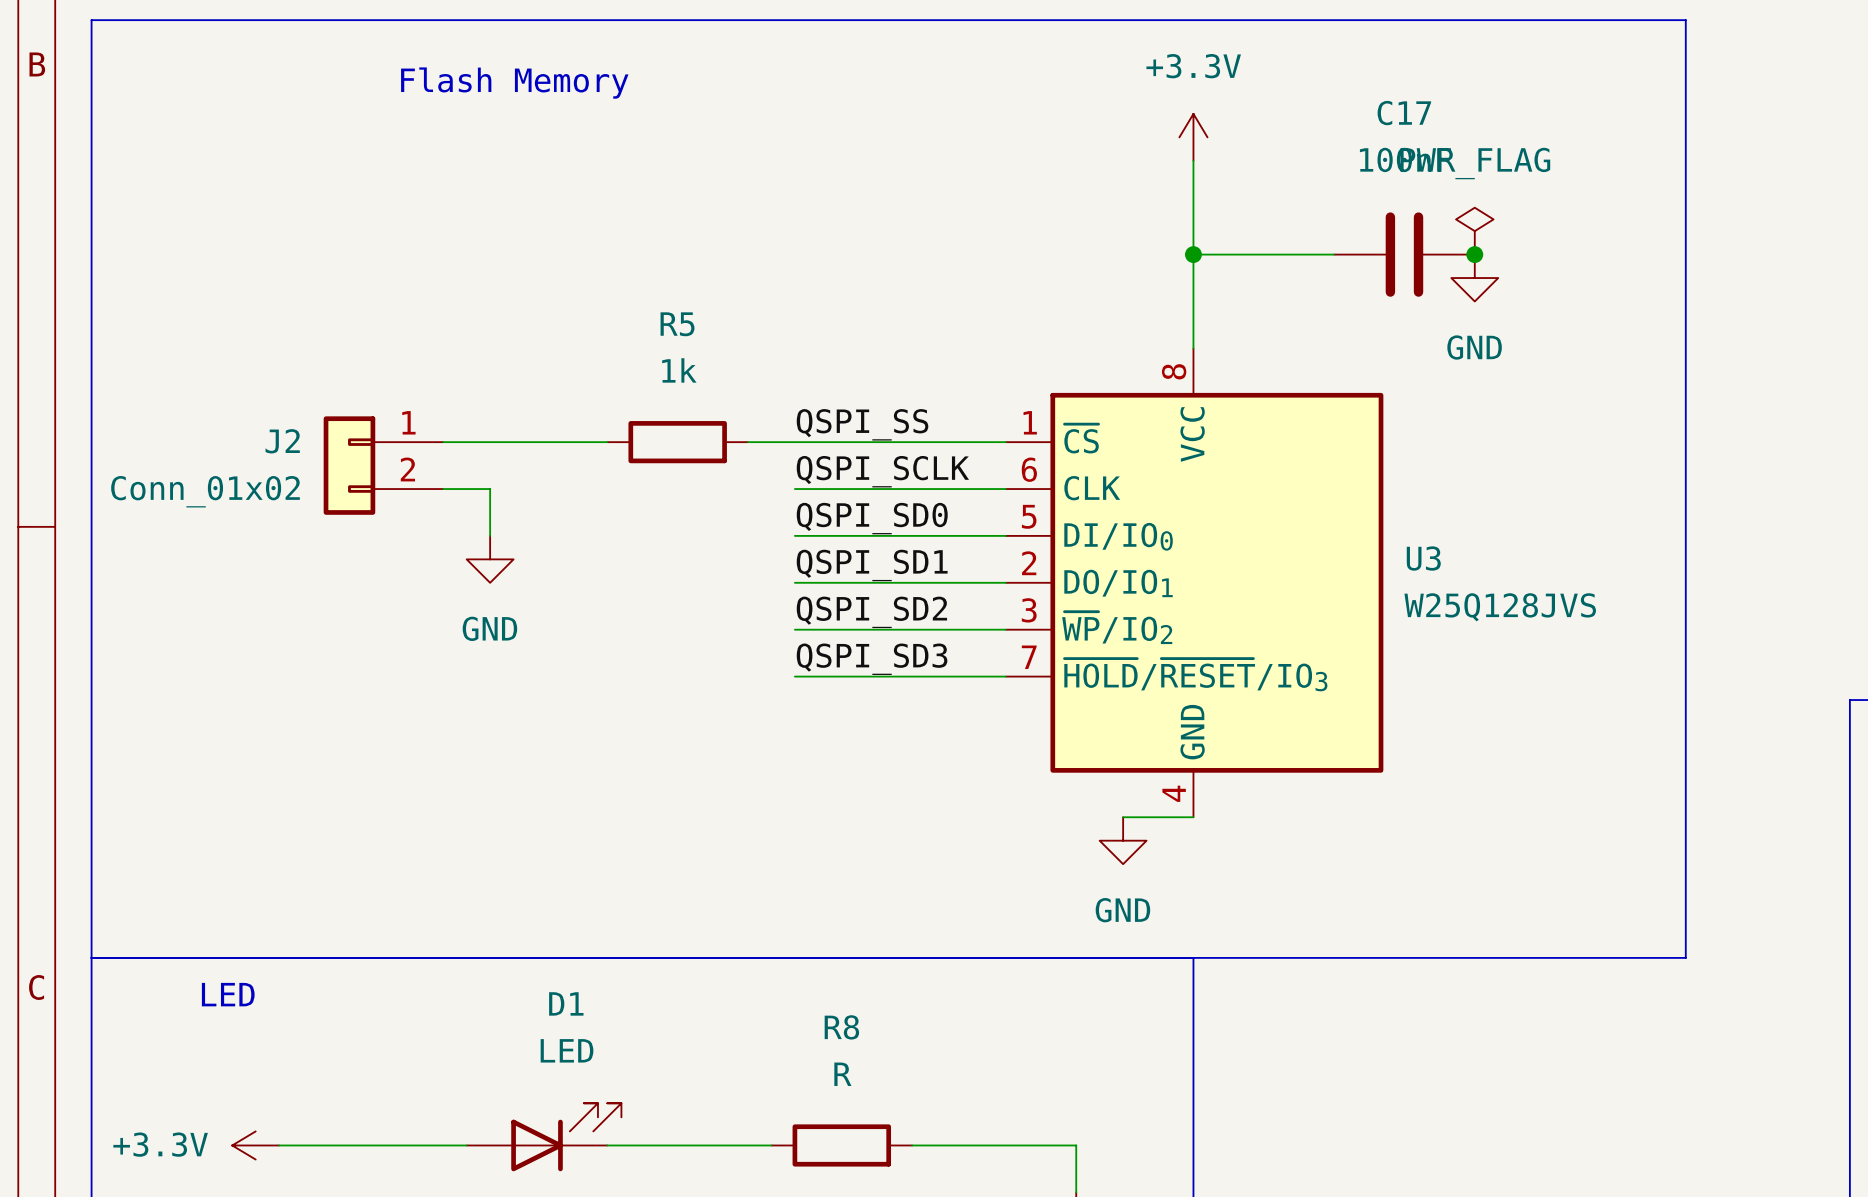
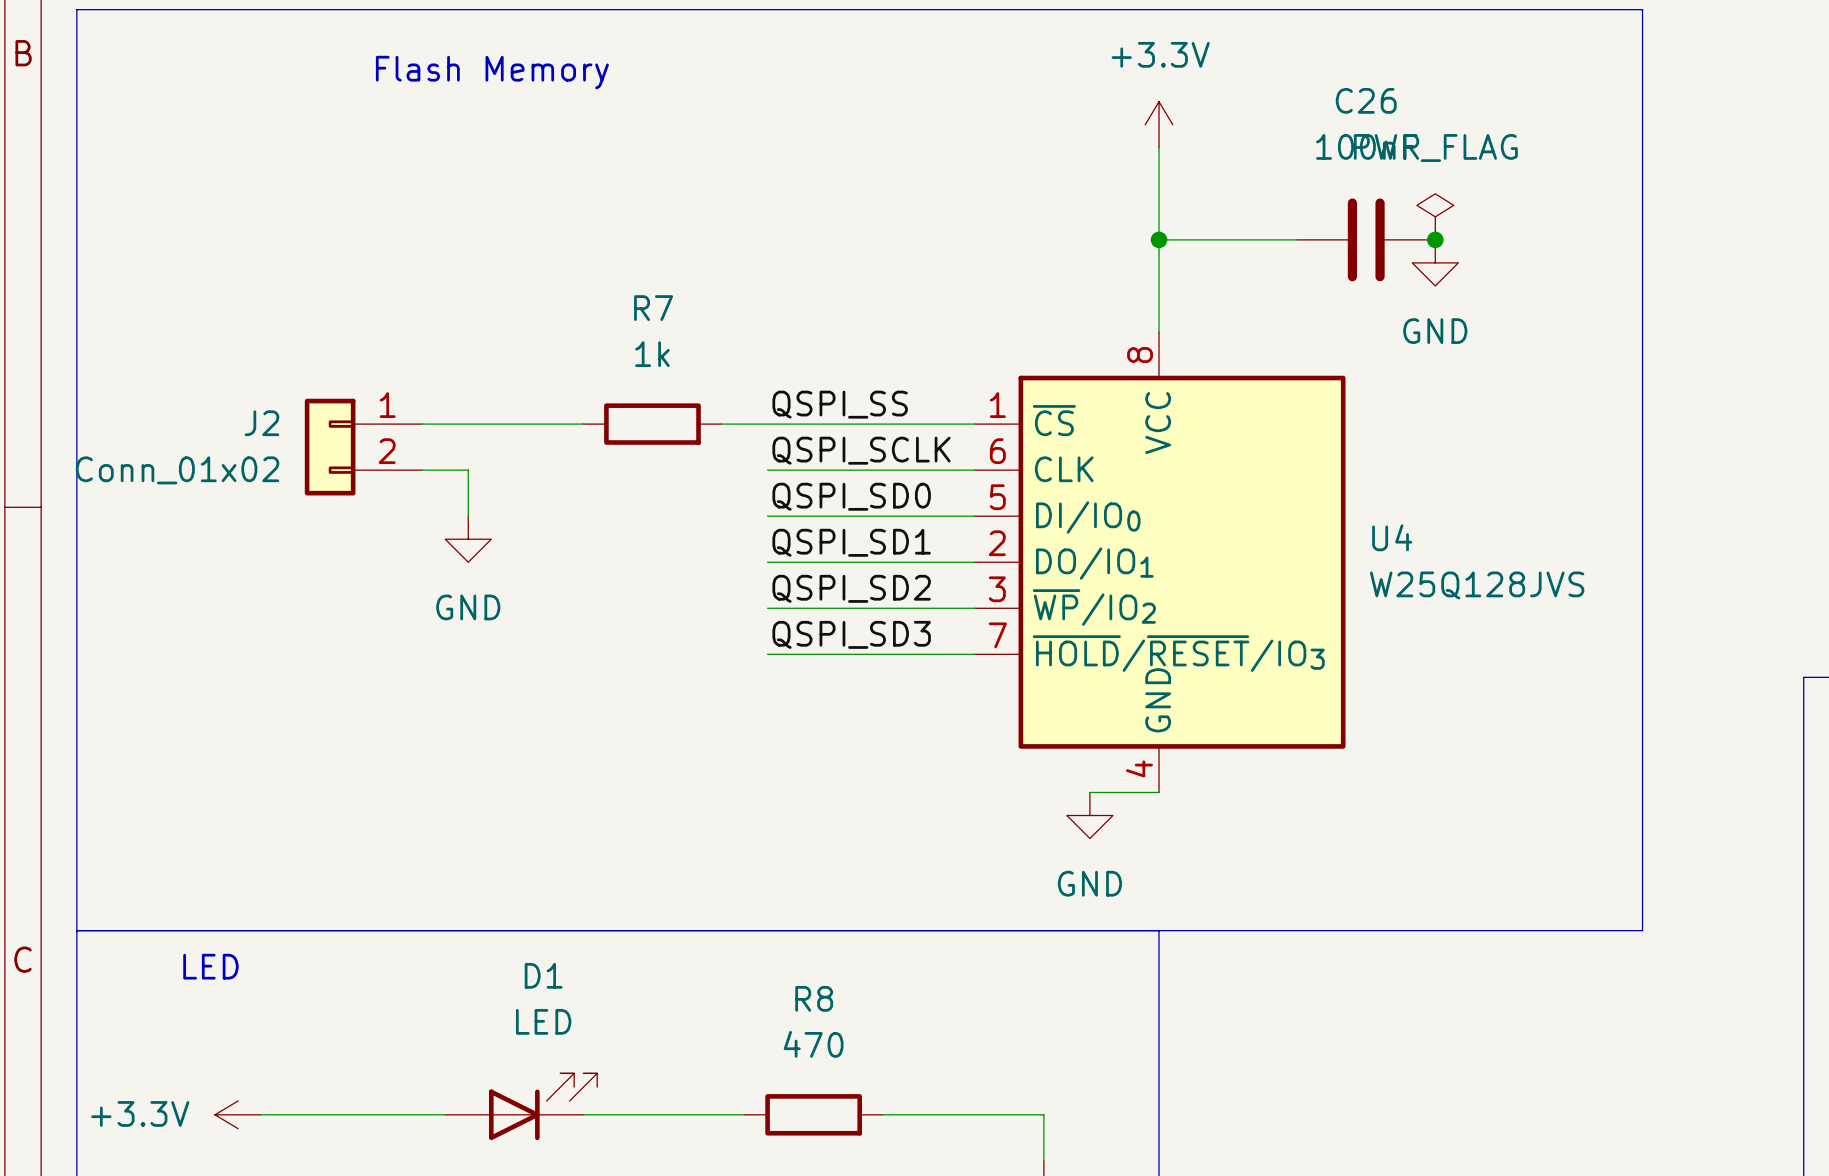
C17 name: C17 (1404, 113) -> C26 (1366, 100)
R5 name: R5 (677, 324) -> R7 (653, 308)
U3 name: U3 (1423, 558) -> U4 (1392, 537)
R8 value: R (842, 1074) -> 470 (813, 1044)

